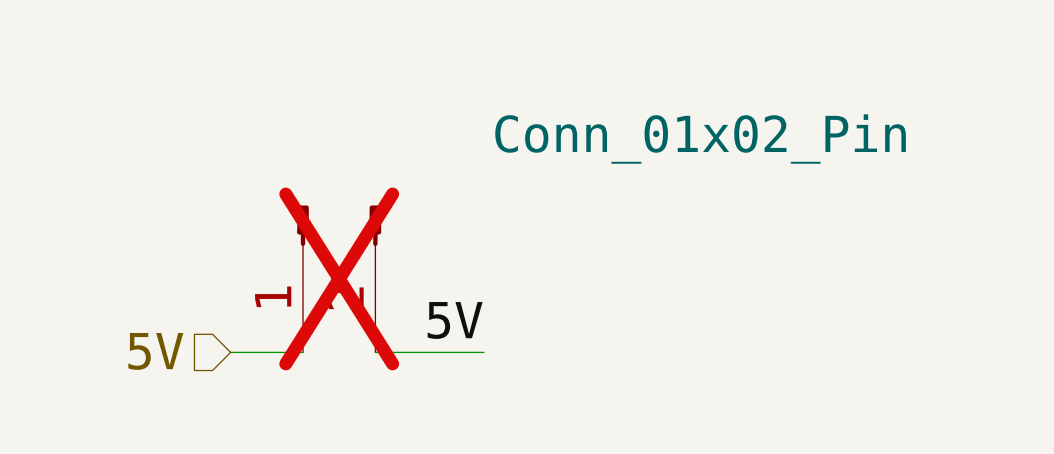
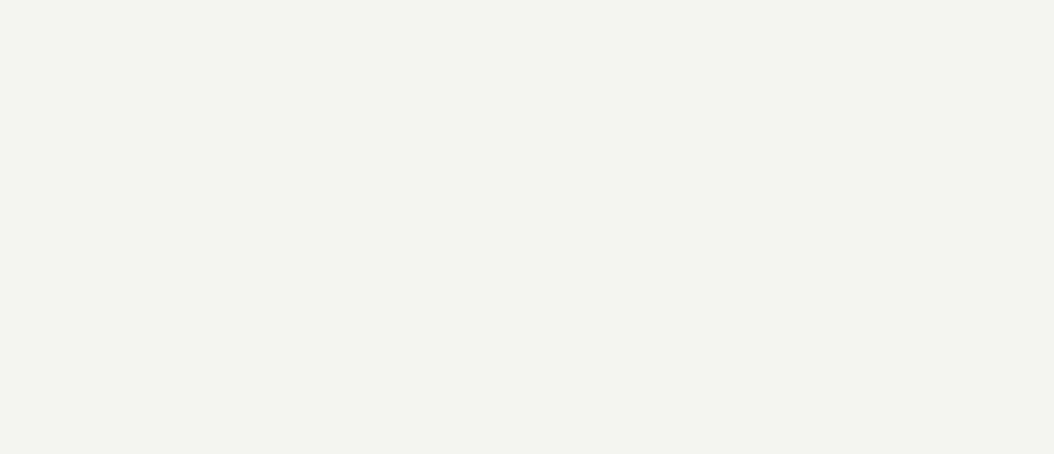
part: Conn_01x02_Pin (339, 278) -> none
label: 5V (455, 320) -> none
hierarchical label: 5V (155, 351) -> none
wire: (230, 352) (303, 352) -> none
wire: (375, 352) (483, 352) -> none

